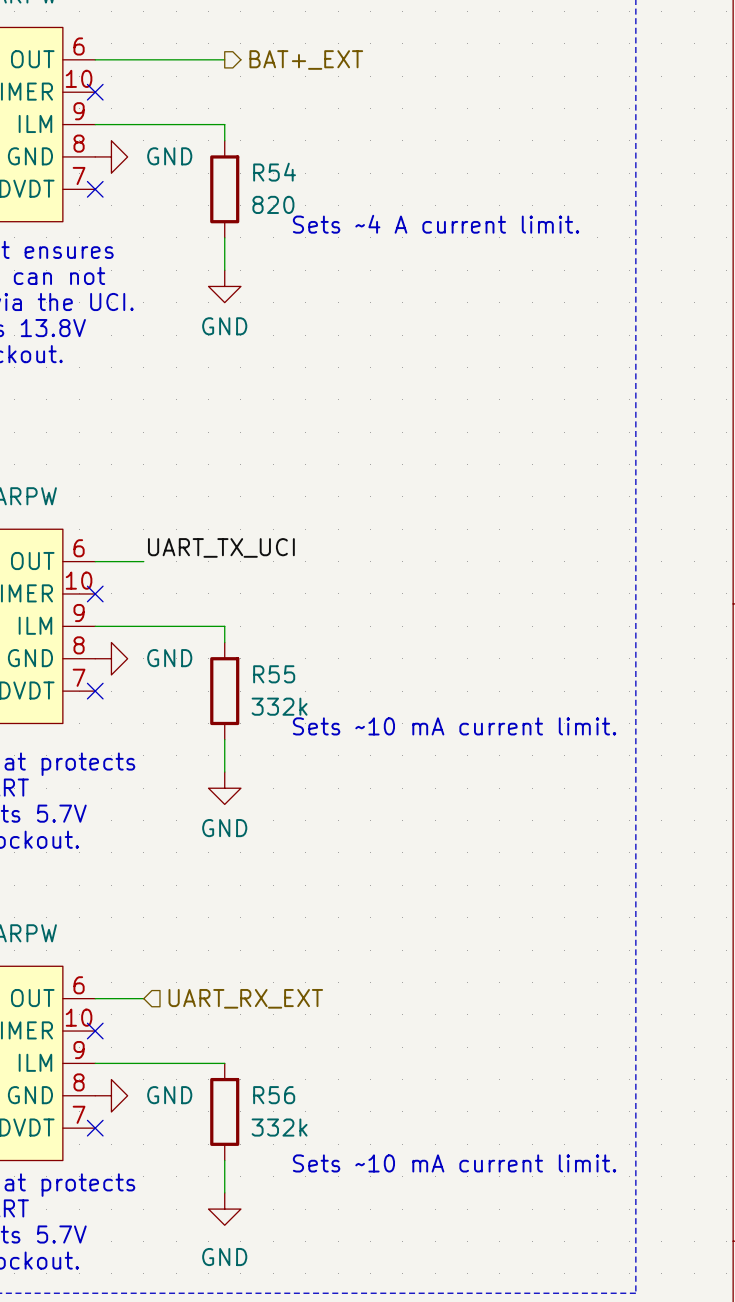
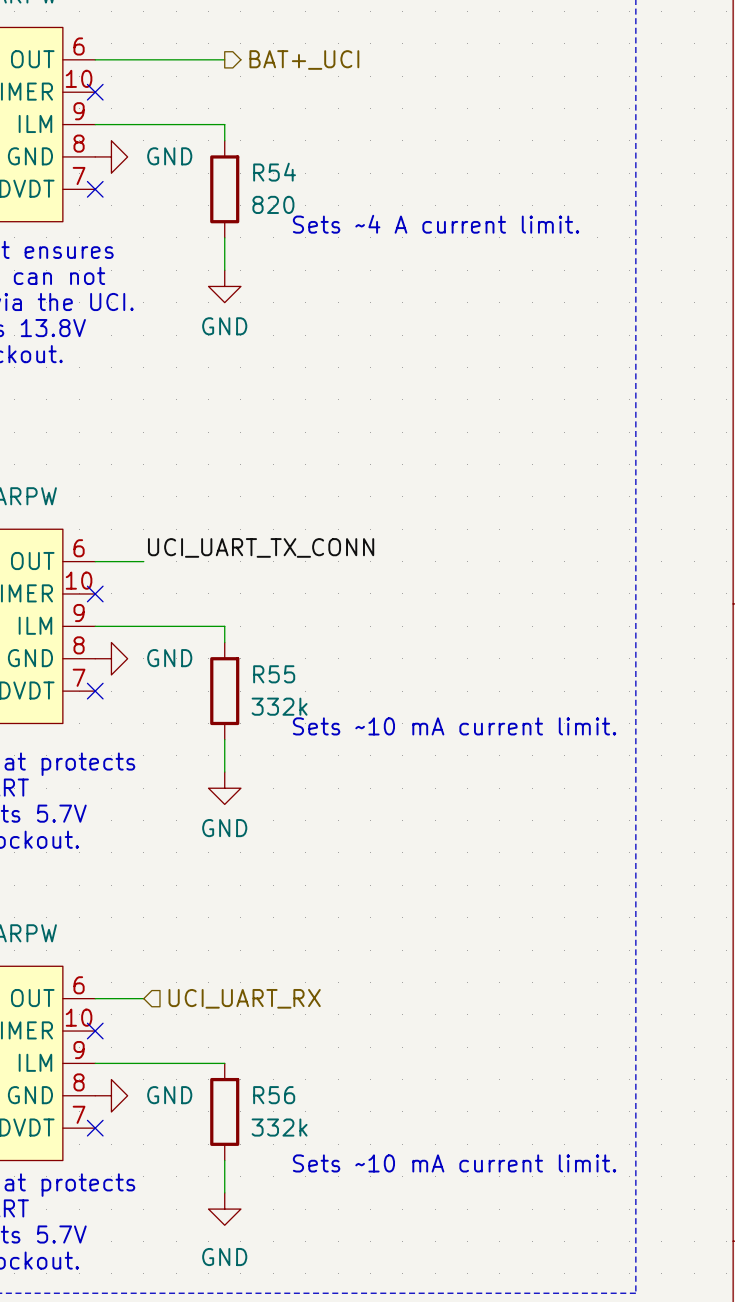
hierarchical label: BAT+_EXT (306, 60) -> BAT+_UCI (304, 60)
label: UART_TX_UCI (221, 547) -> UCI_UART_TX_CONN (261, 547)
hierarchical label: UART_RX_EXT (245, 998) -> UCI_UART_RX (244, 998)

